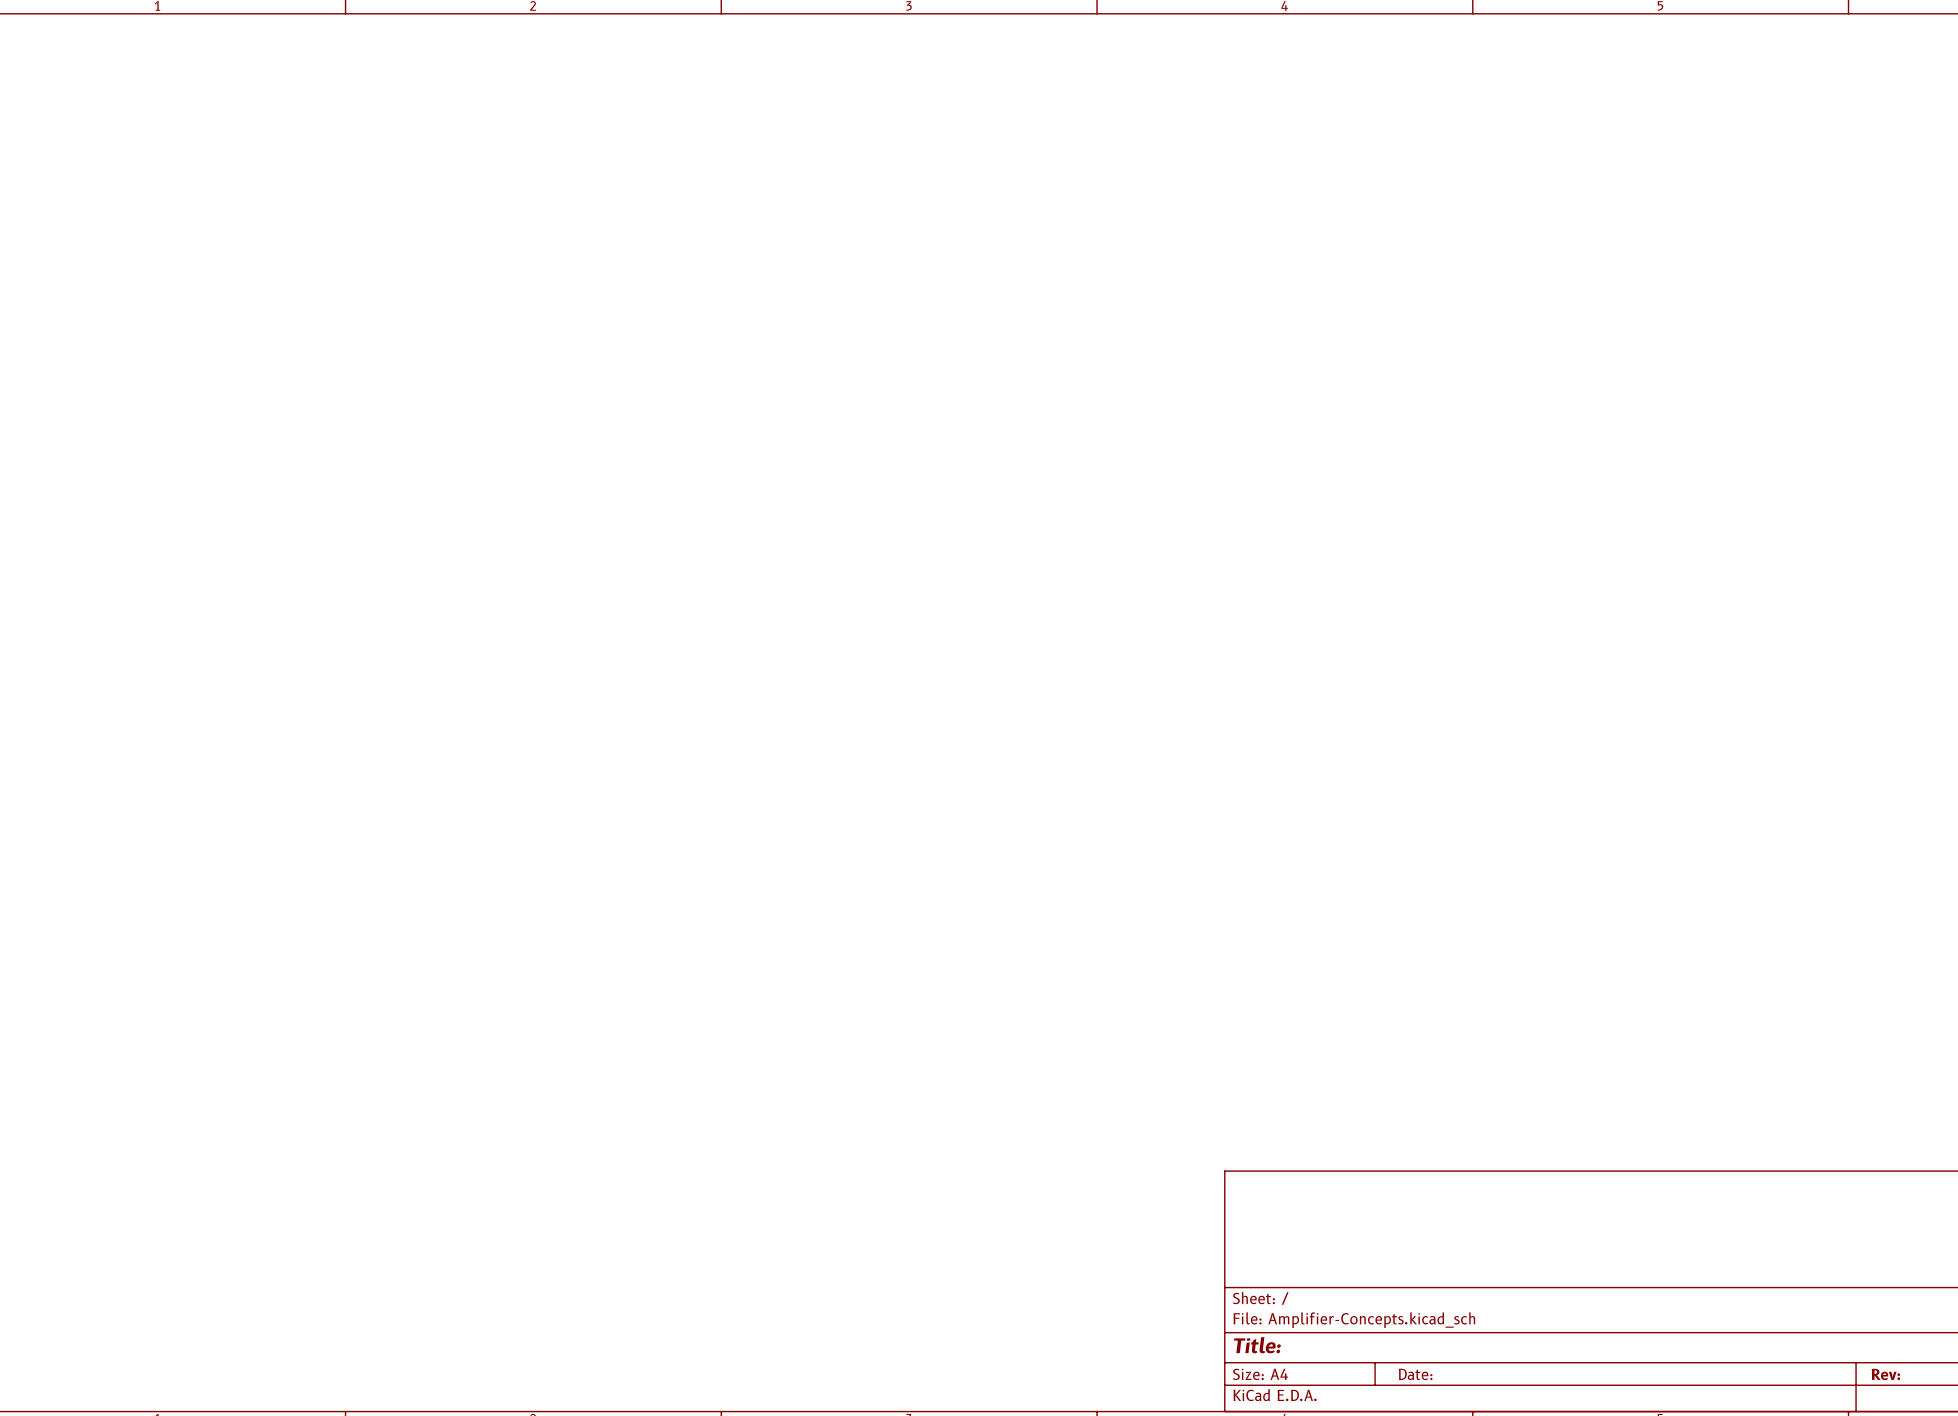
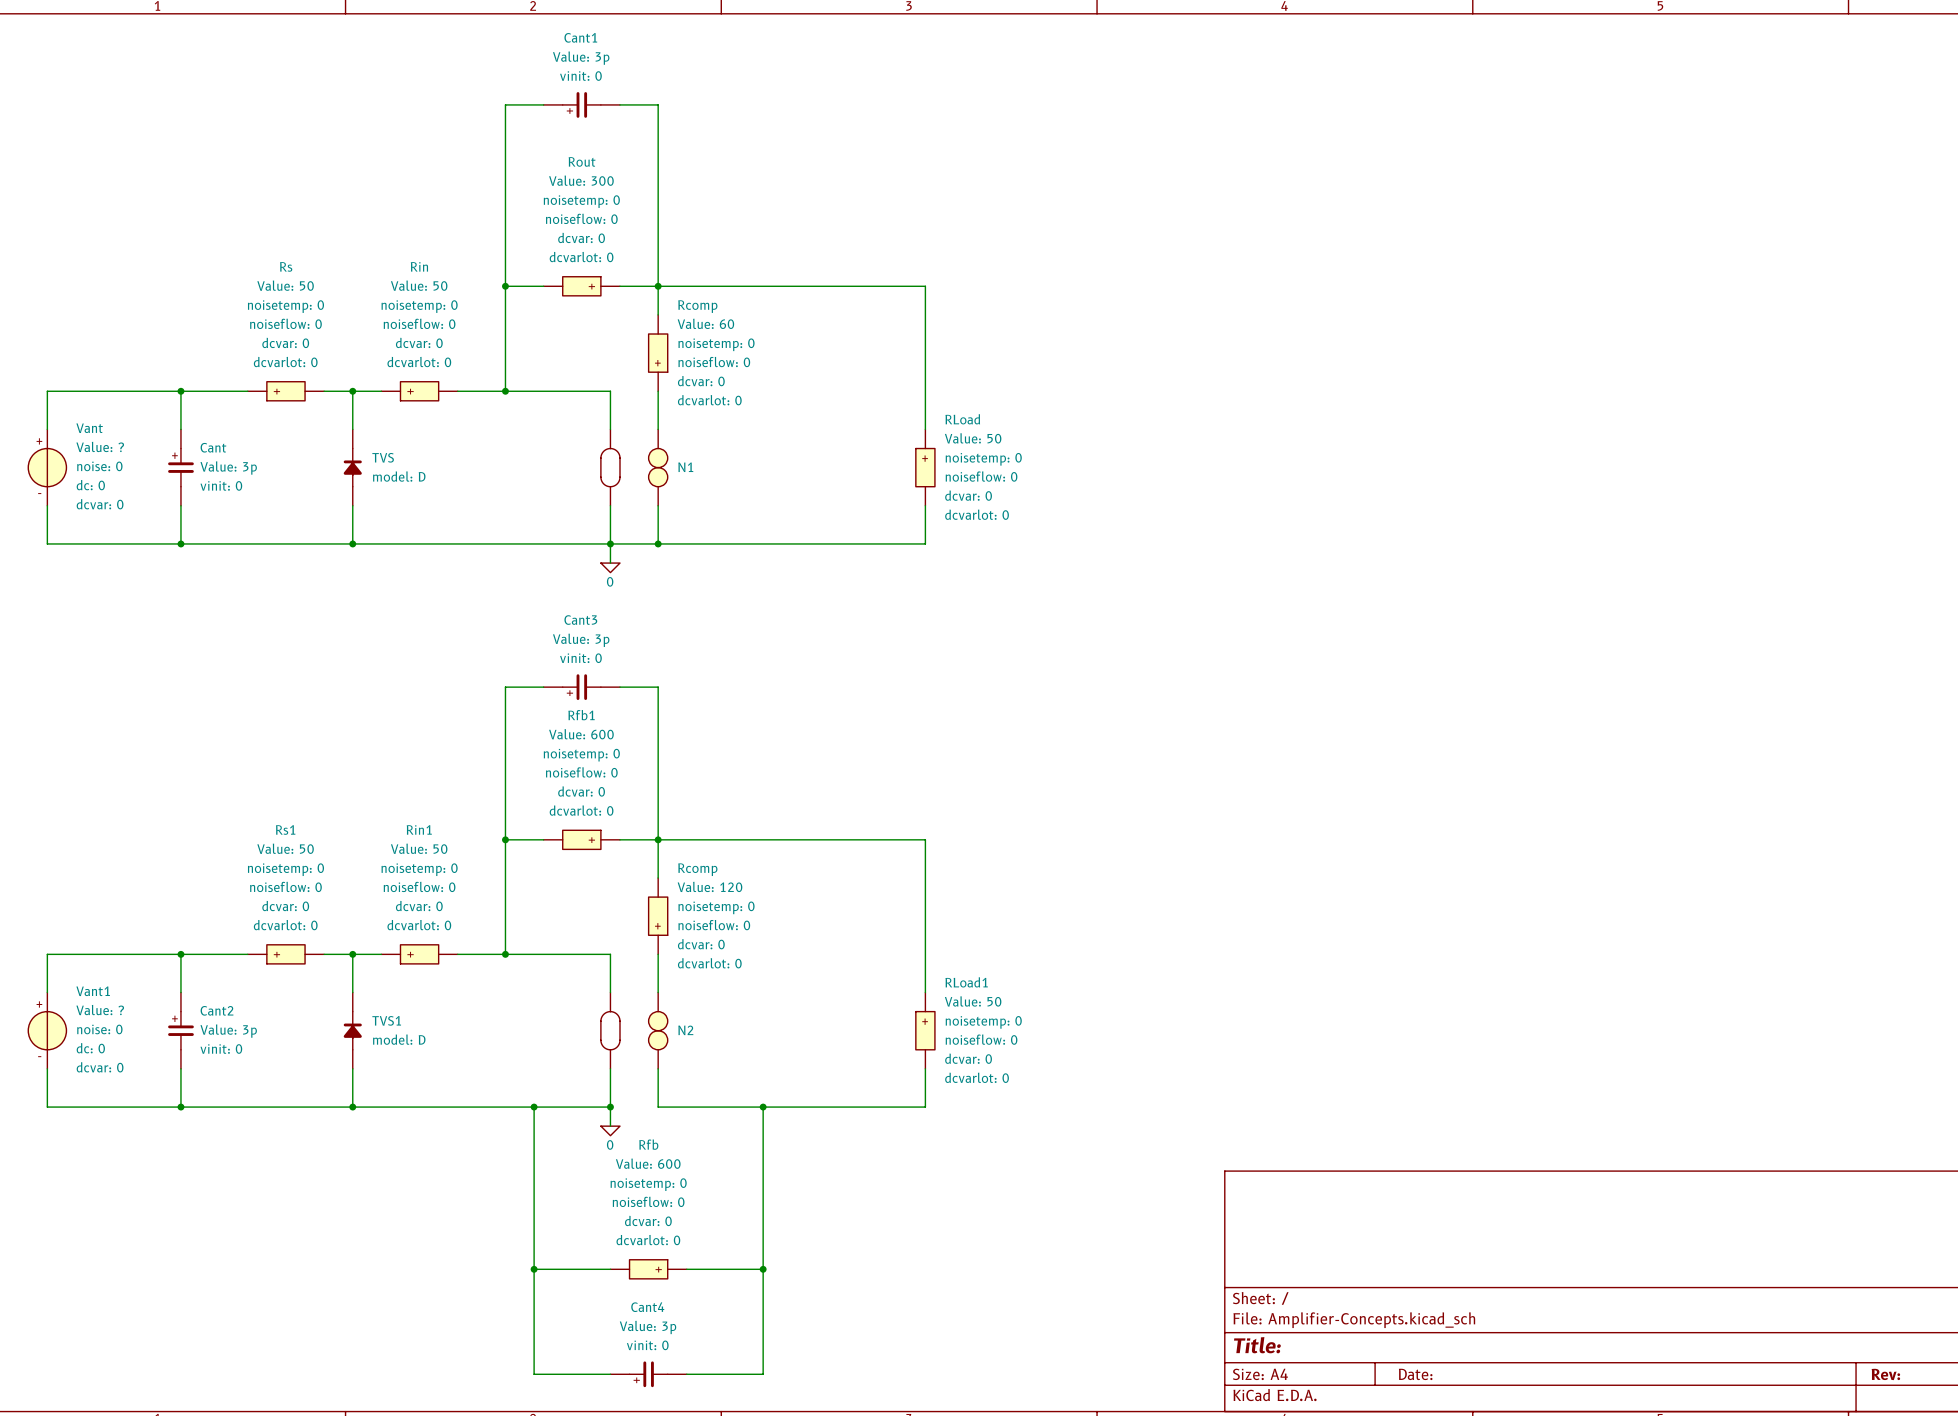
wire: none -> (543, 104) (505, 104) (505, 391)
Cant1: none -> Value: 3p (581, 104)
wire: none -> (619, 104) (658, 104) (658, 314)
wire: none -> (505, 286) (543, 286)
junction: none -> (505, 286)
Rout: none -> Value: 300 (581, 286)
wire: none -> (619, 286) (925, 286) (925, 429)
junction: none -> (658, 286)
Rcomp: none -> Value: 60 (658, 353)
wire: none -> (180, 391) (180, 429)
junction: none -> (180, 391)
wire: none -> (247, 391) (47, 391) (47, 429)
Rs: none -> Value: 50 (285, 391)
wire: none -> (324, 391) (381, 391)
wire: none -> (352, 391) (352, 429)
junction: none -> (352, 391)
Rin: none -> Value: 50 (419, 391)
wire: none -> (457, 391) (610, 391) (610, 429)
junction: none -> (505, 391)
wire: none -> (658, 391) (658, 429)
Vant: none -> Value: ? (47, 467)
Cant: none -> Value: 3p (180, 467)
TVS: none -> (352, 467)
N1: none -> (634, 467)
RLoad: none -> Value: 50 (925, 467)
wire: none -> (47, 505) (47, 543) (925, 543) (925, 505)
wire: none -> (180, 505) (180, 543)
wire: none -> (352, 505) (352, 543)
wire: none -> (610, 505) (610, 563)
wire: none -> (658, 505) (658, 543)
junction: none -> (180, 543)
junction: none -> (352, 543)
junction: none -> (610, 543)
junction: none -> (658, 543)
power symbol: none -> 0 (610, 567)
wire: none -> (543, 687) (505, 687) (505, 954)
Cant3: none -> Value: 3p (581, 687)
wire: none -> (619, 687) (658, 687) (658, 878)
wire: none -> (505, 839) (543, 839)
junction: none -> (505, 839)
Rfb1: none -> Value: 600 (581, 839)
wire: none -> (619, 839) (925, 839) (925, 992)
junction: none -> (658, 839)
Rcomp: none -> Value: 120 (658, 916)
wire: none -> (180, 954) (180, 992)
junction: none -> (180, 954)
wire: none -> (247, 954) (47, 954) (47, 992)
Rs1: none -> Value: 50 (285, 954)
wire: none -> (324, 954) (381, 954)
wire: none -> (352, 954) (352, 992)
junction: none -> (352, 954)
Rin1: none -> Value: 50 (419, 954)
wire: none -> (457, 954) (610, 954) (610, 992)
junction: none -> (505, 954)
wire: none -> (658, 954) (658, 992)
Vant1: none -> Value: ? (47, 1030)
Cant2: none -> Value: 3p (180, 1030)
TVS1: none -> (352, 1030)
N2: none -> (634, 1030)
RLoad1: none -> Value: 50 (925, 1030)
wire: none -> (47, 1068) (47, 1107) (610, 1107)
wire: none -> (180, 1068) (180, 1107)
wire: none -> (352, 1068) (352, 1107)
wire: none -> (610, 1068) (610, 1126)
wire: none -> (658, 1068) (658, 1107) (925, 1107) (925, 1068)
junction: none -> (180, 1107)
junction: none -> (352, 1107)
wire: none -> (534, 1107) (534, 1374) (610, 1374)
junction: none -> (534, 1107)
junction: none -> (610, 1107)
wire: none -> (763, 1107) (763, 1374) (686, 1374)
junction: none -> (763, 1107)
power symbol: none -> 0 (610, 1130)
wire: none -> (534, 1269) (610, 1269)
junction: none -> (534, 1269)
Rfb: none -> Value: 600 (648, 1269)
wire: none -> (686, 1269) (763, 1269)
junction: none -> (763, 1269)
Cant4: none -> Value: 3p (648, 1374)

